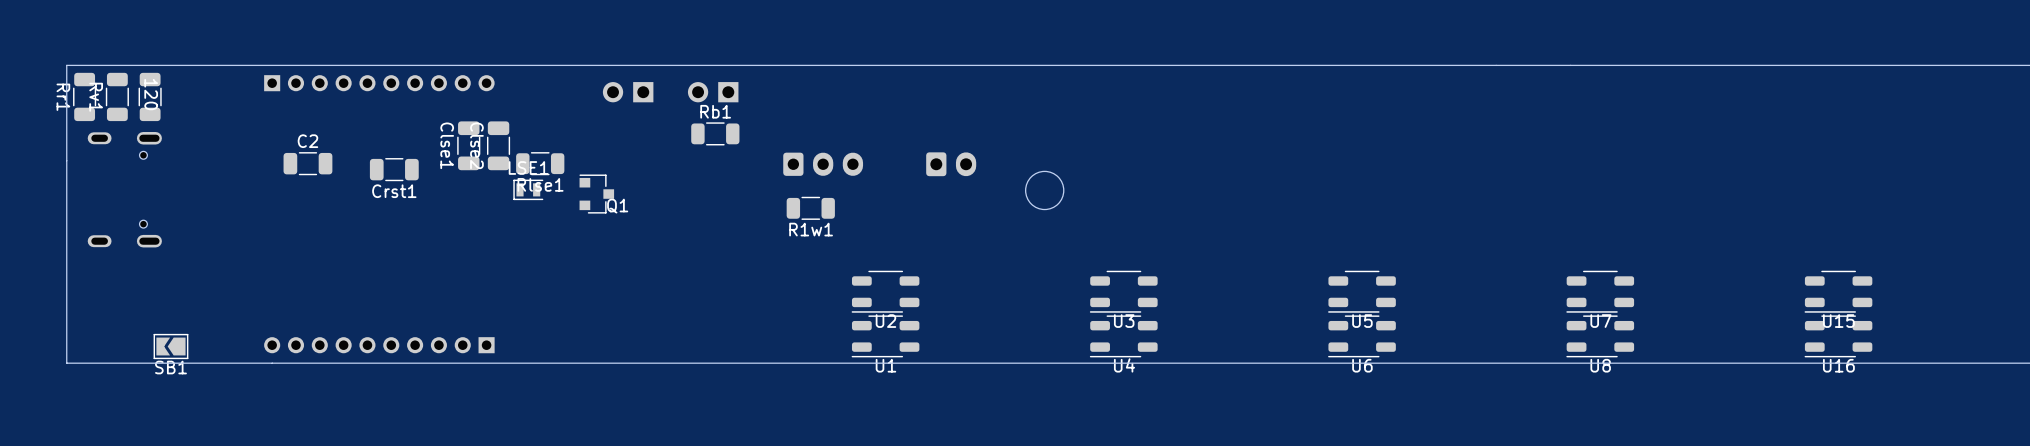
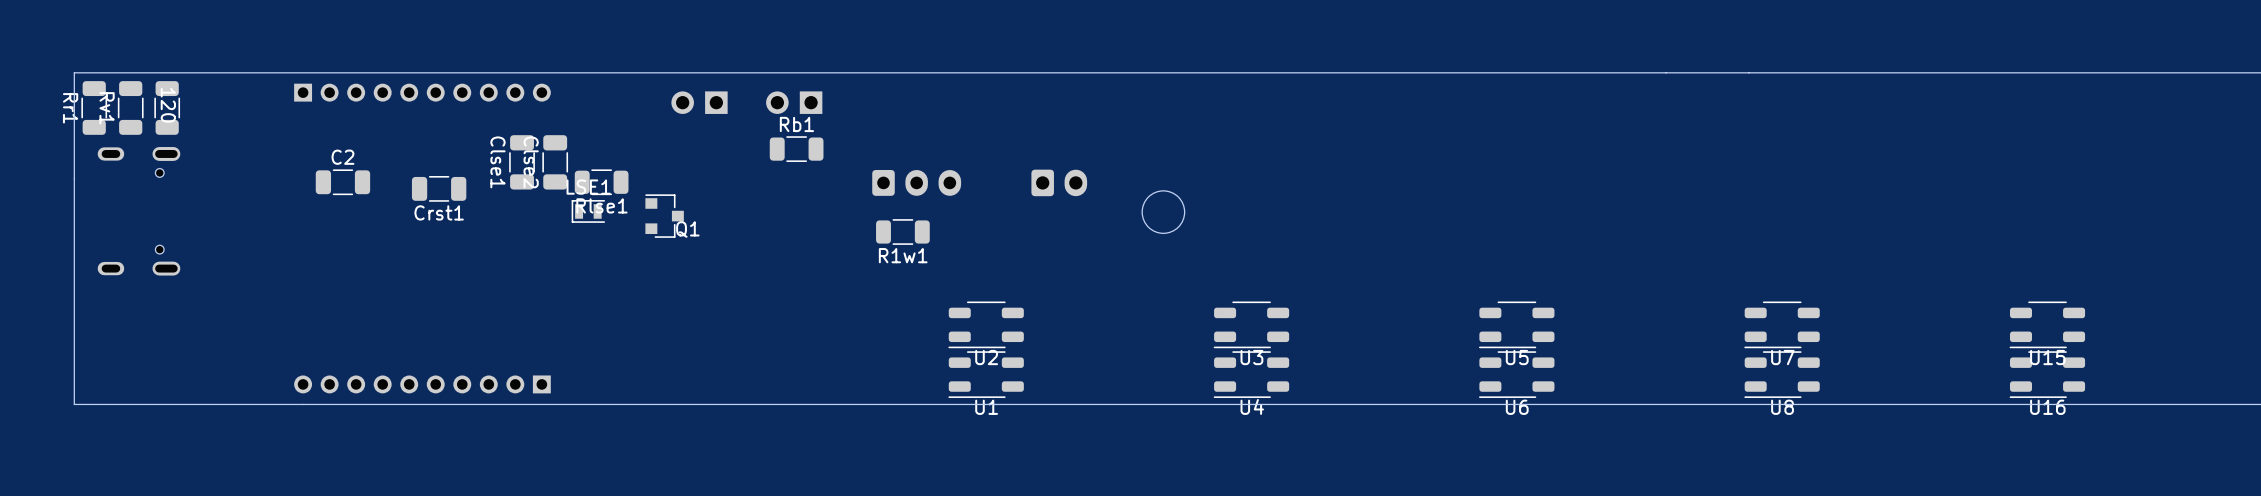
SB1: (170, 346) -> none

